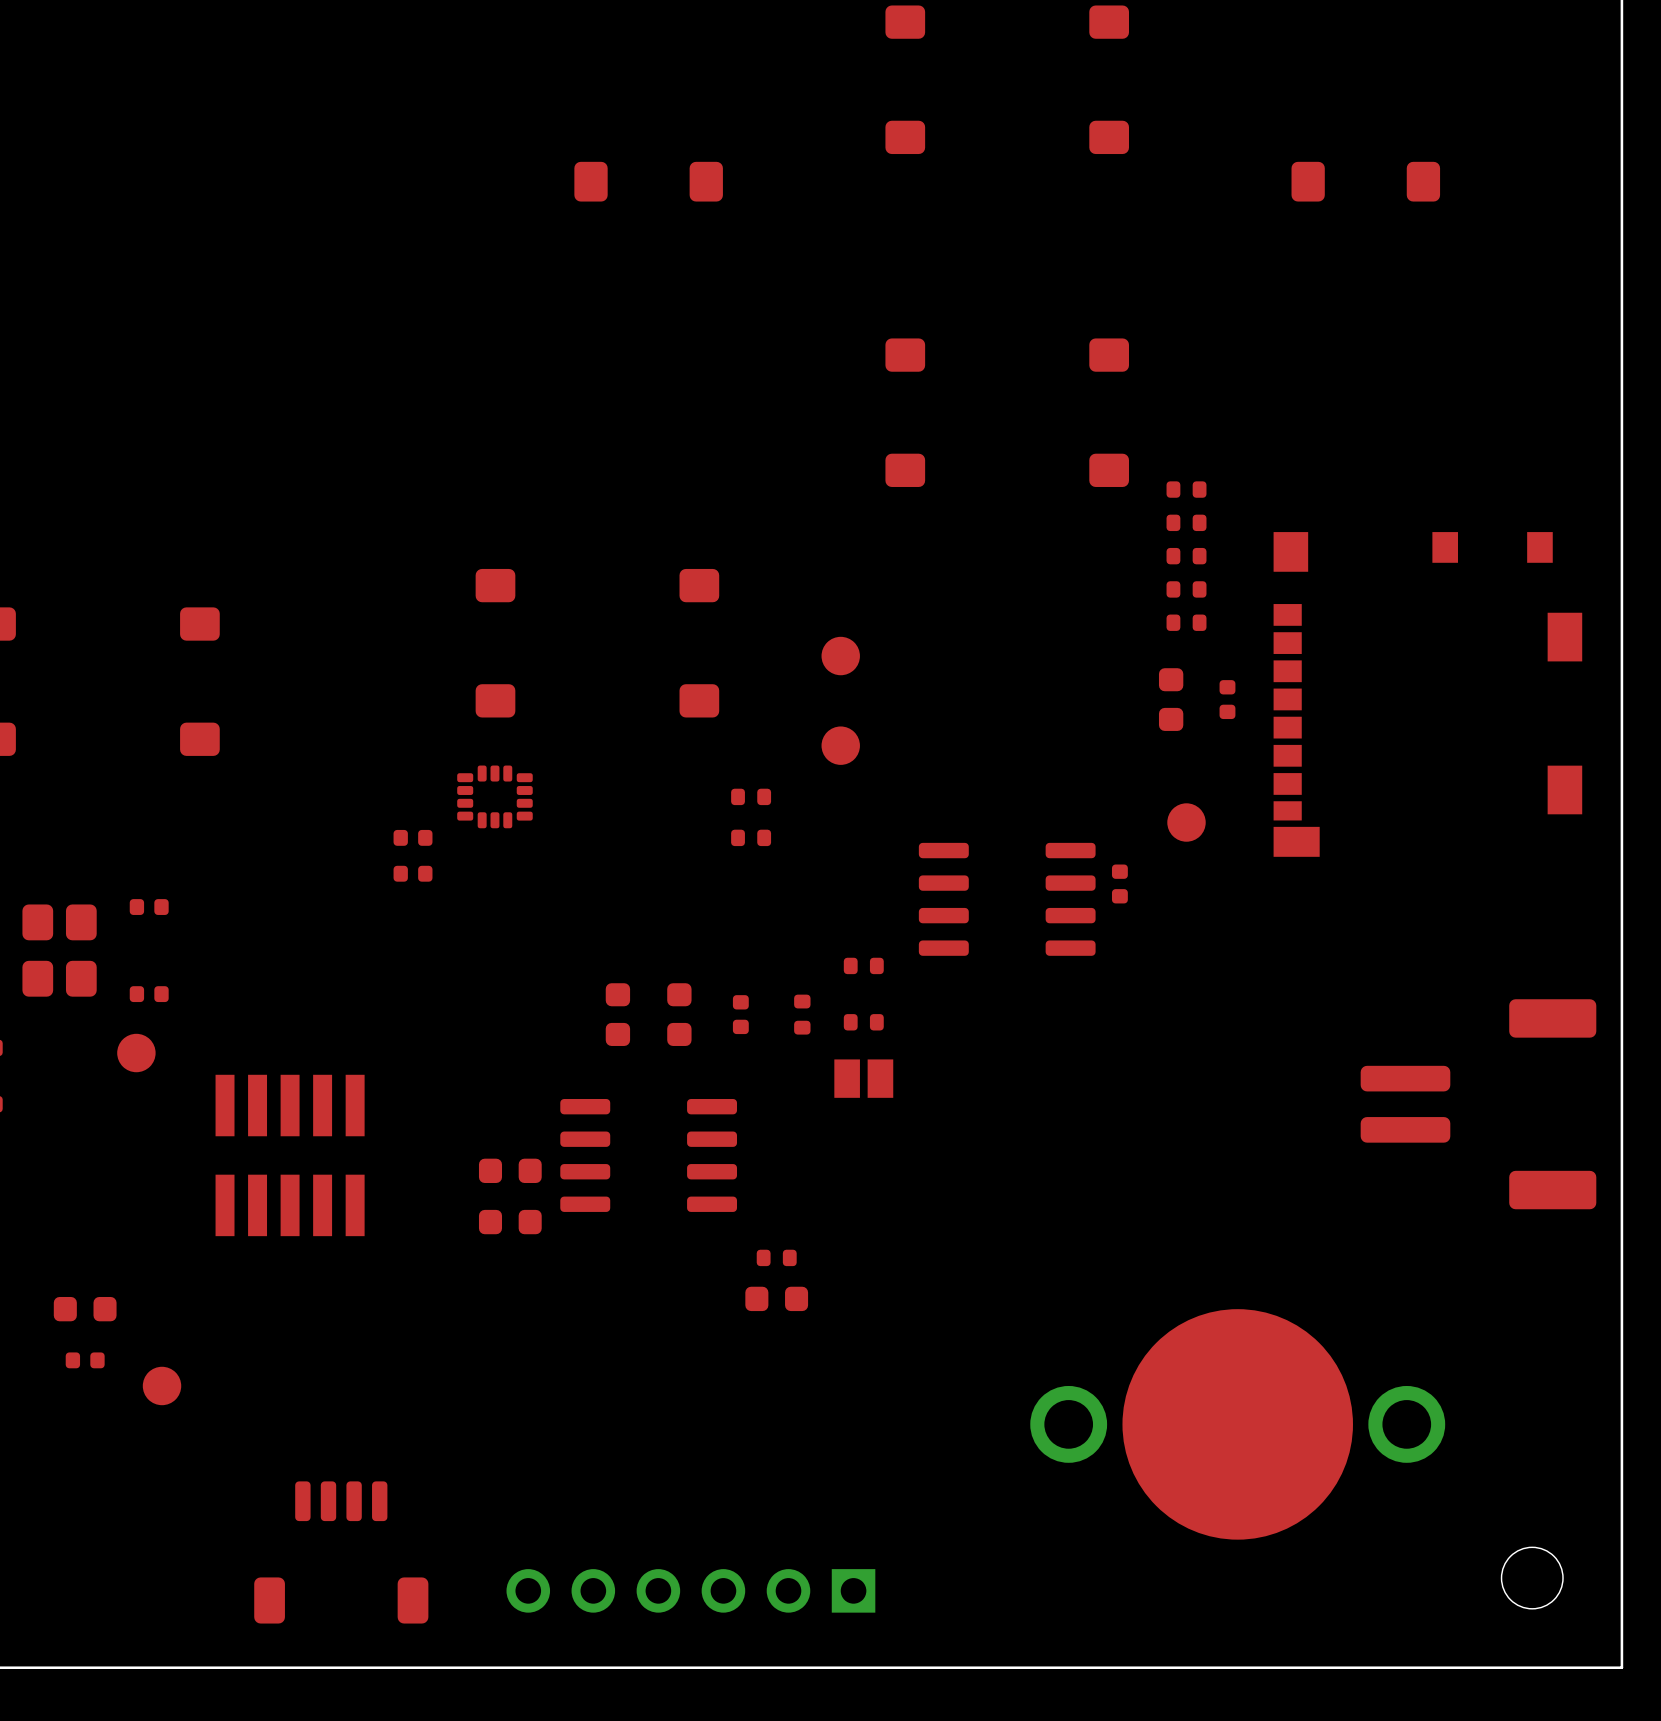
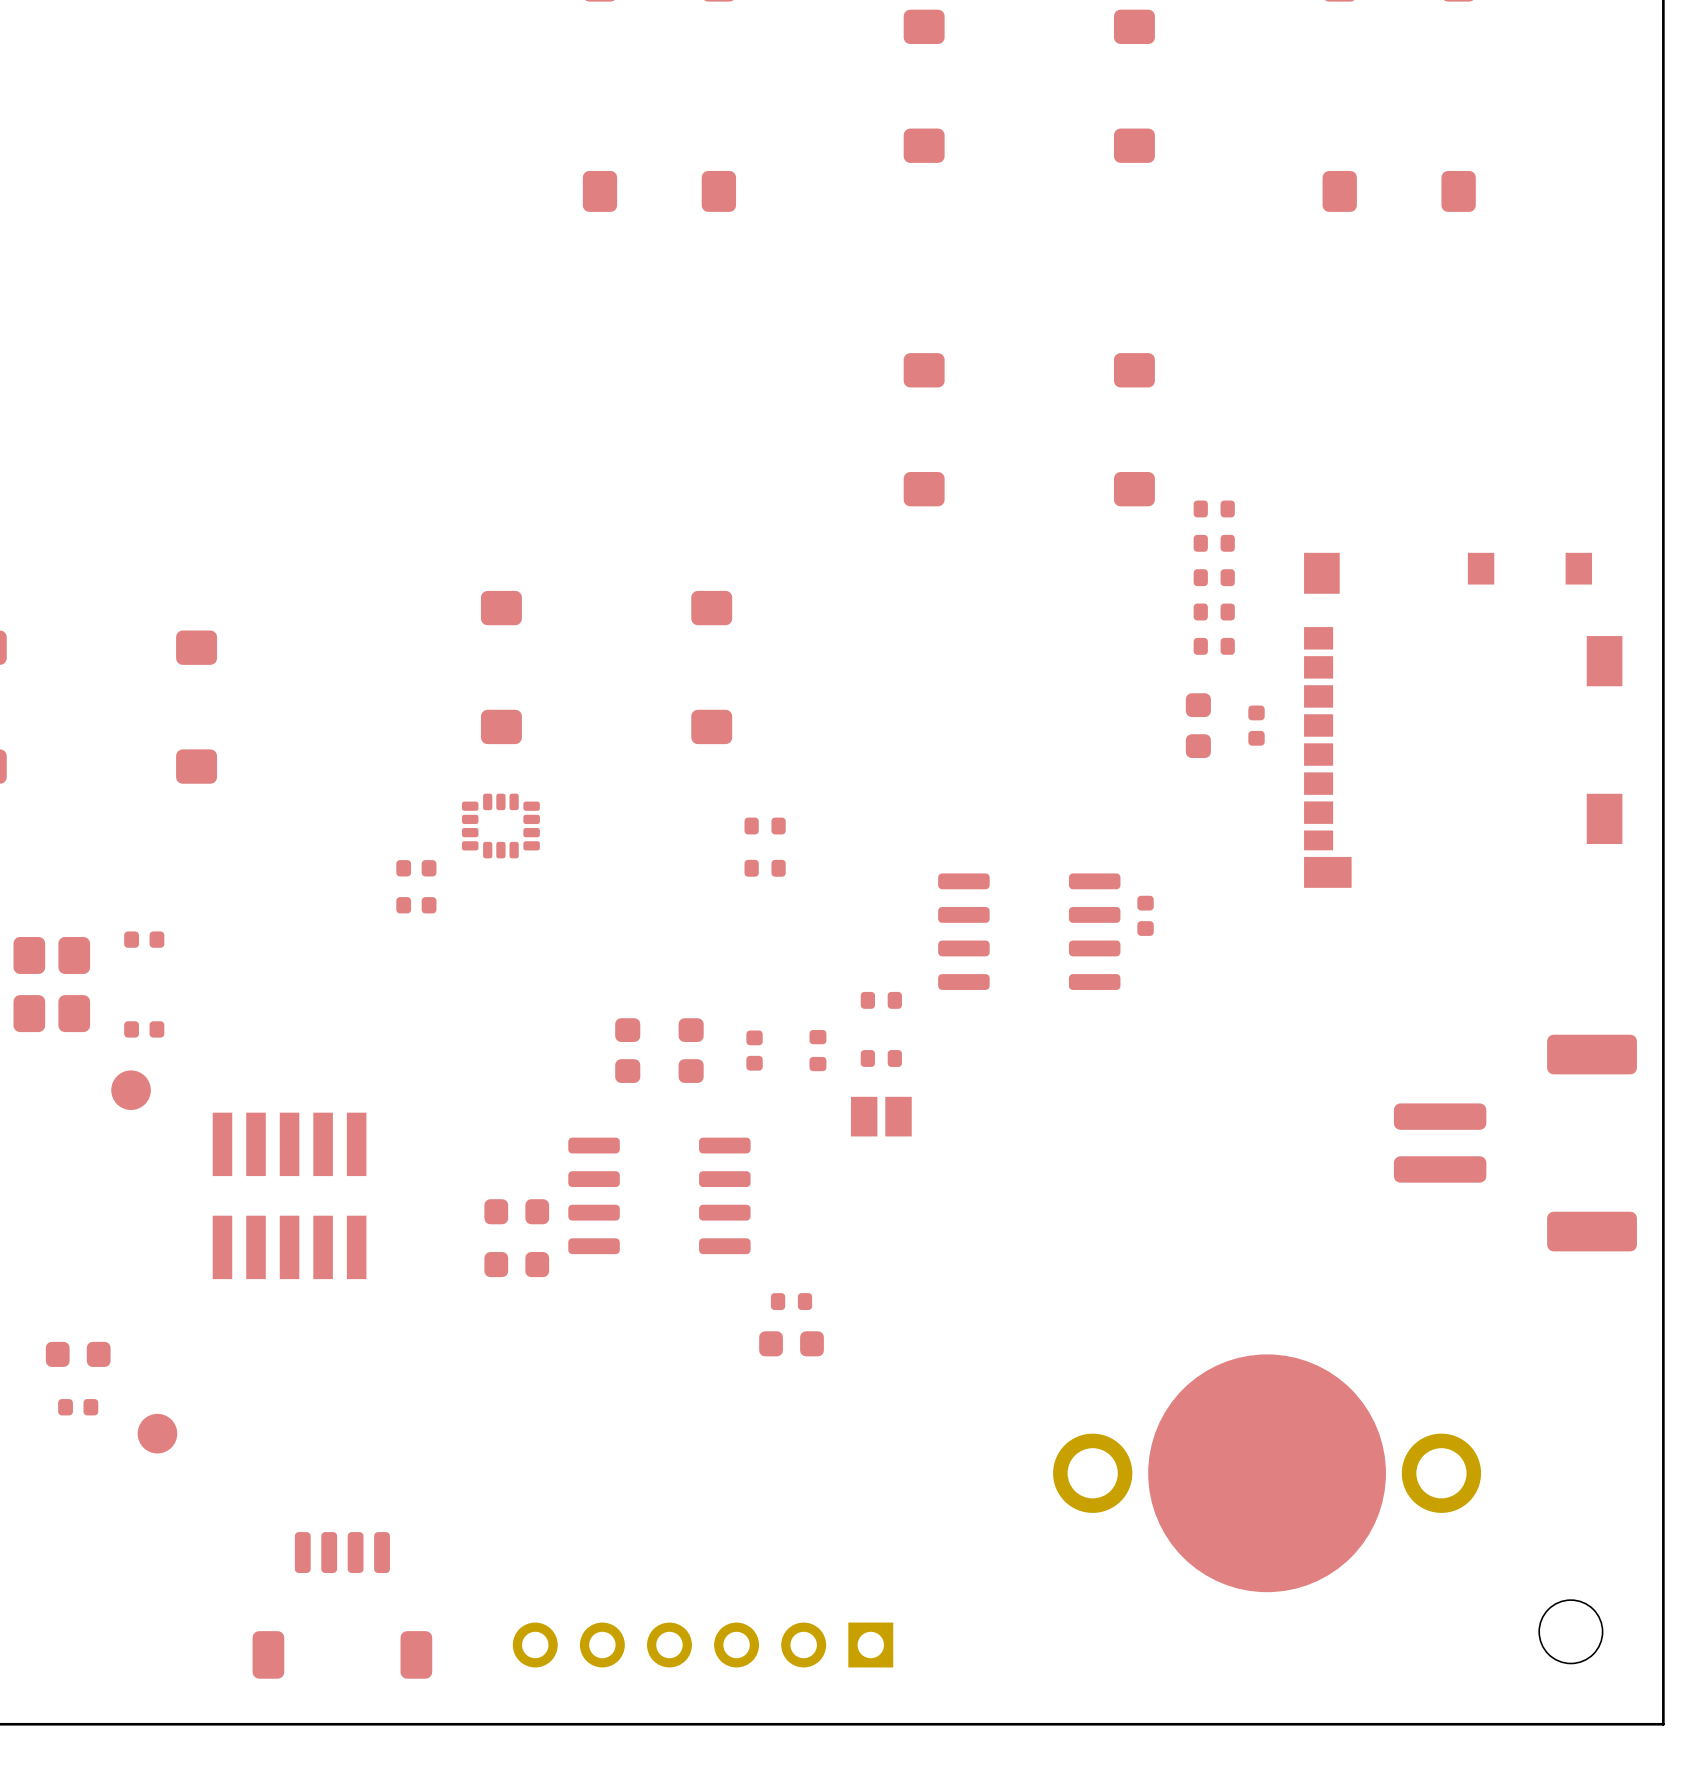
part: (840, 656) -> none
part: (840, 745) -> none
part: (1186, 822) -> none

